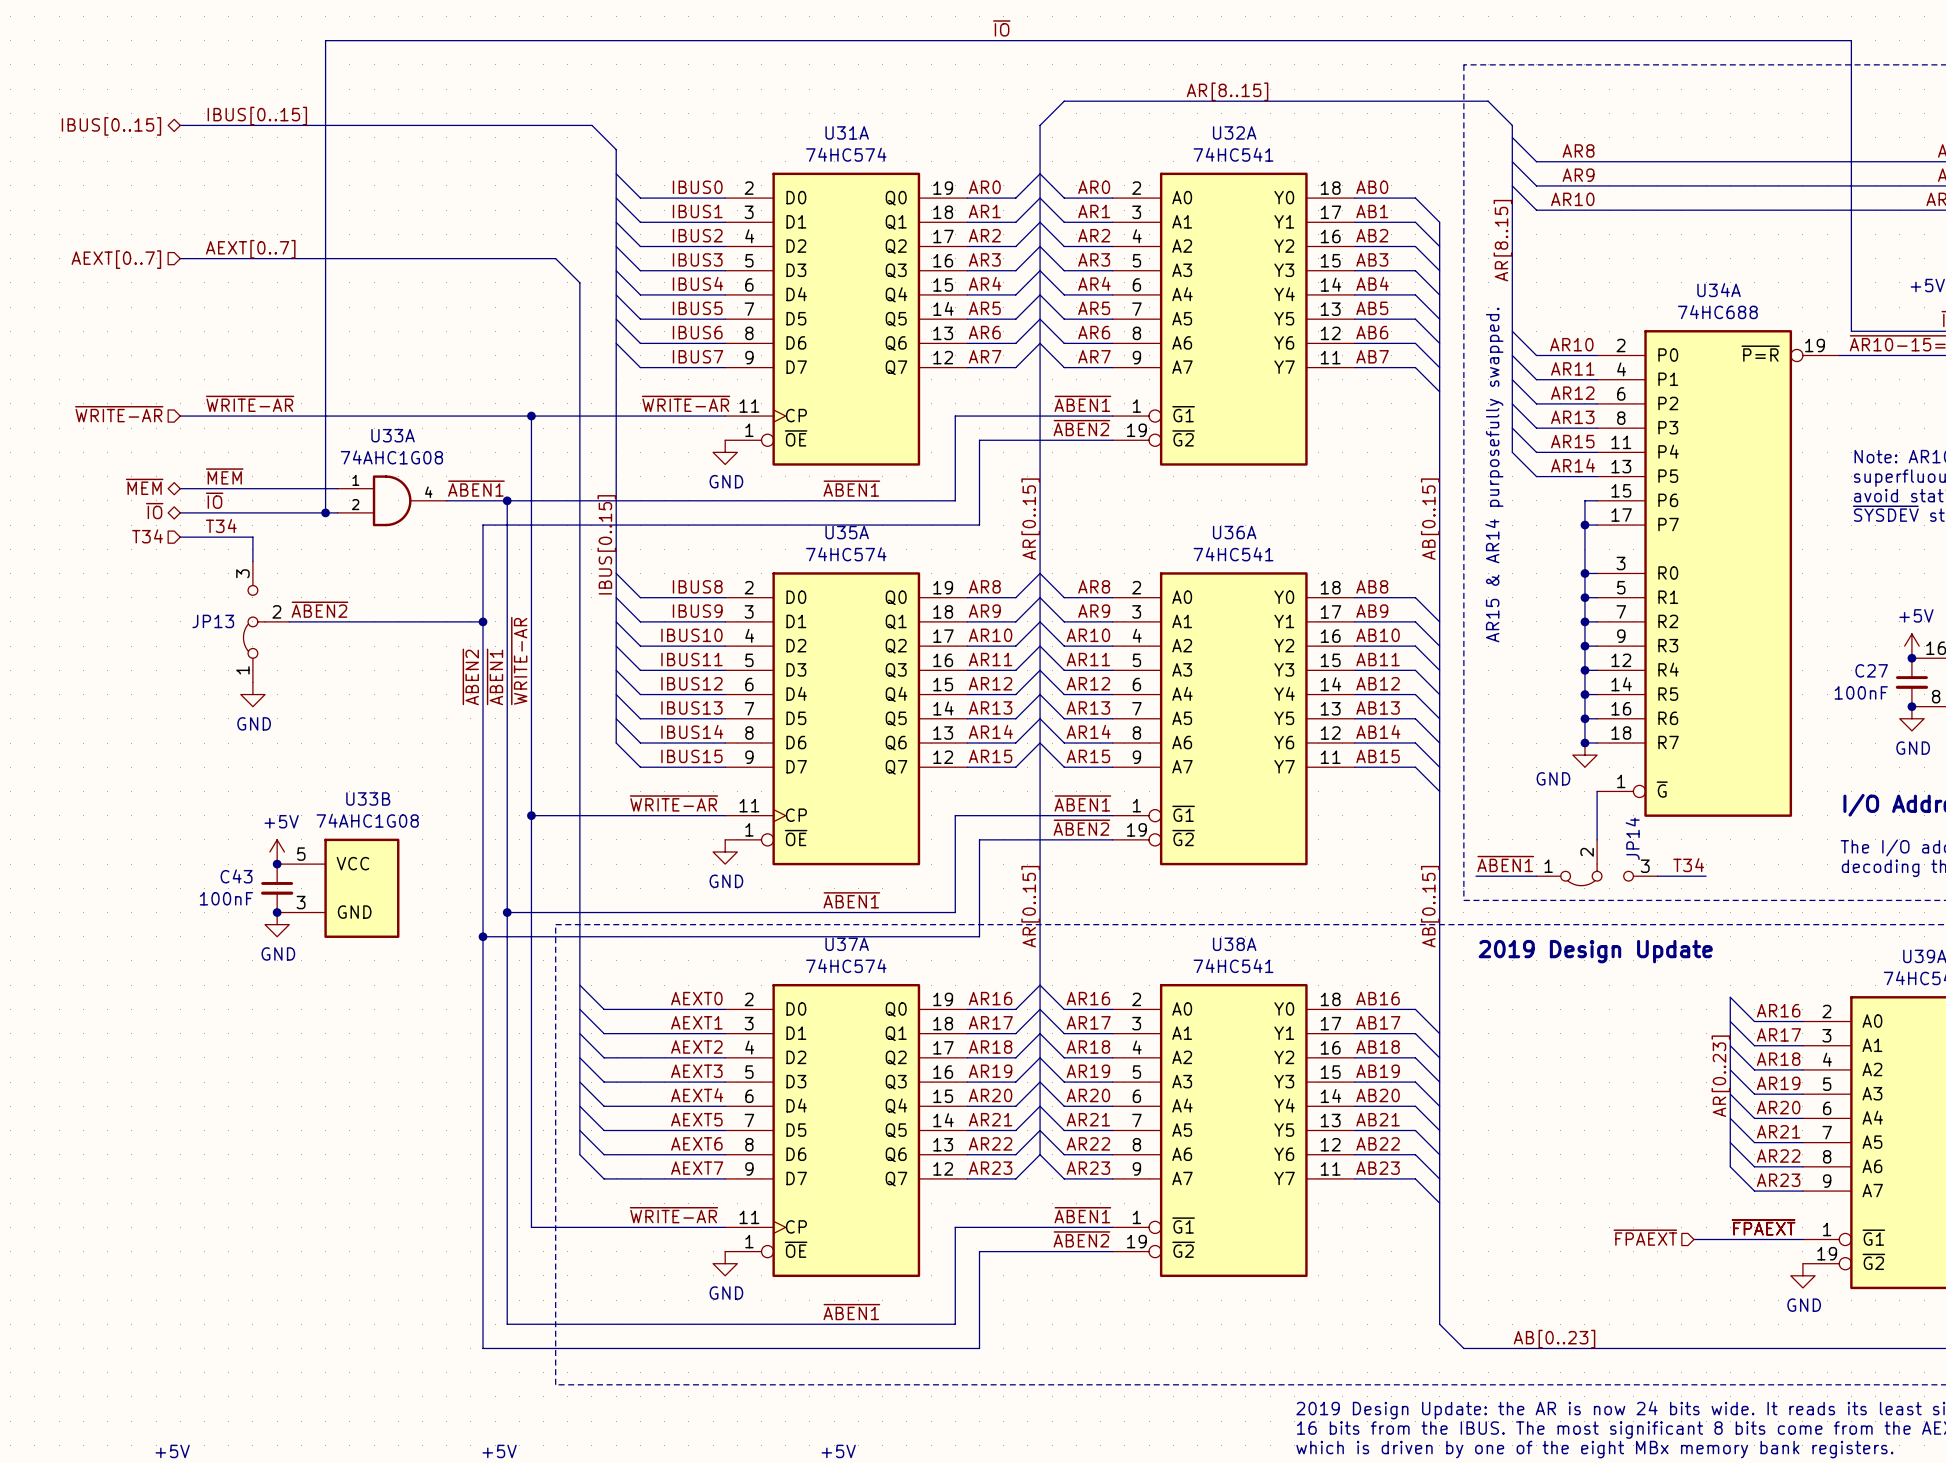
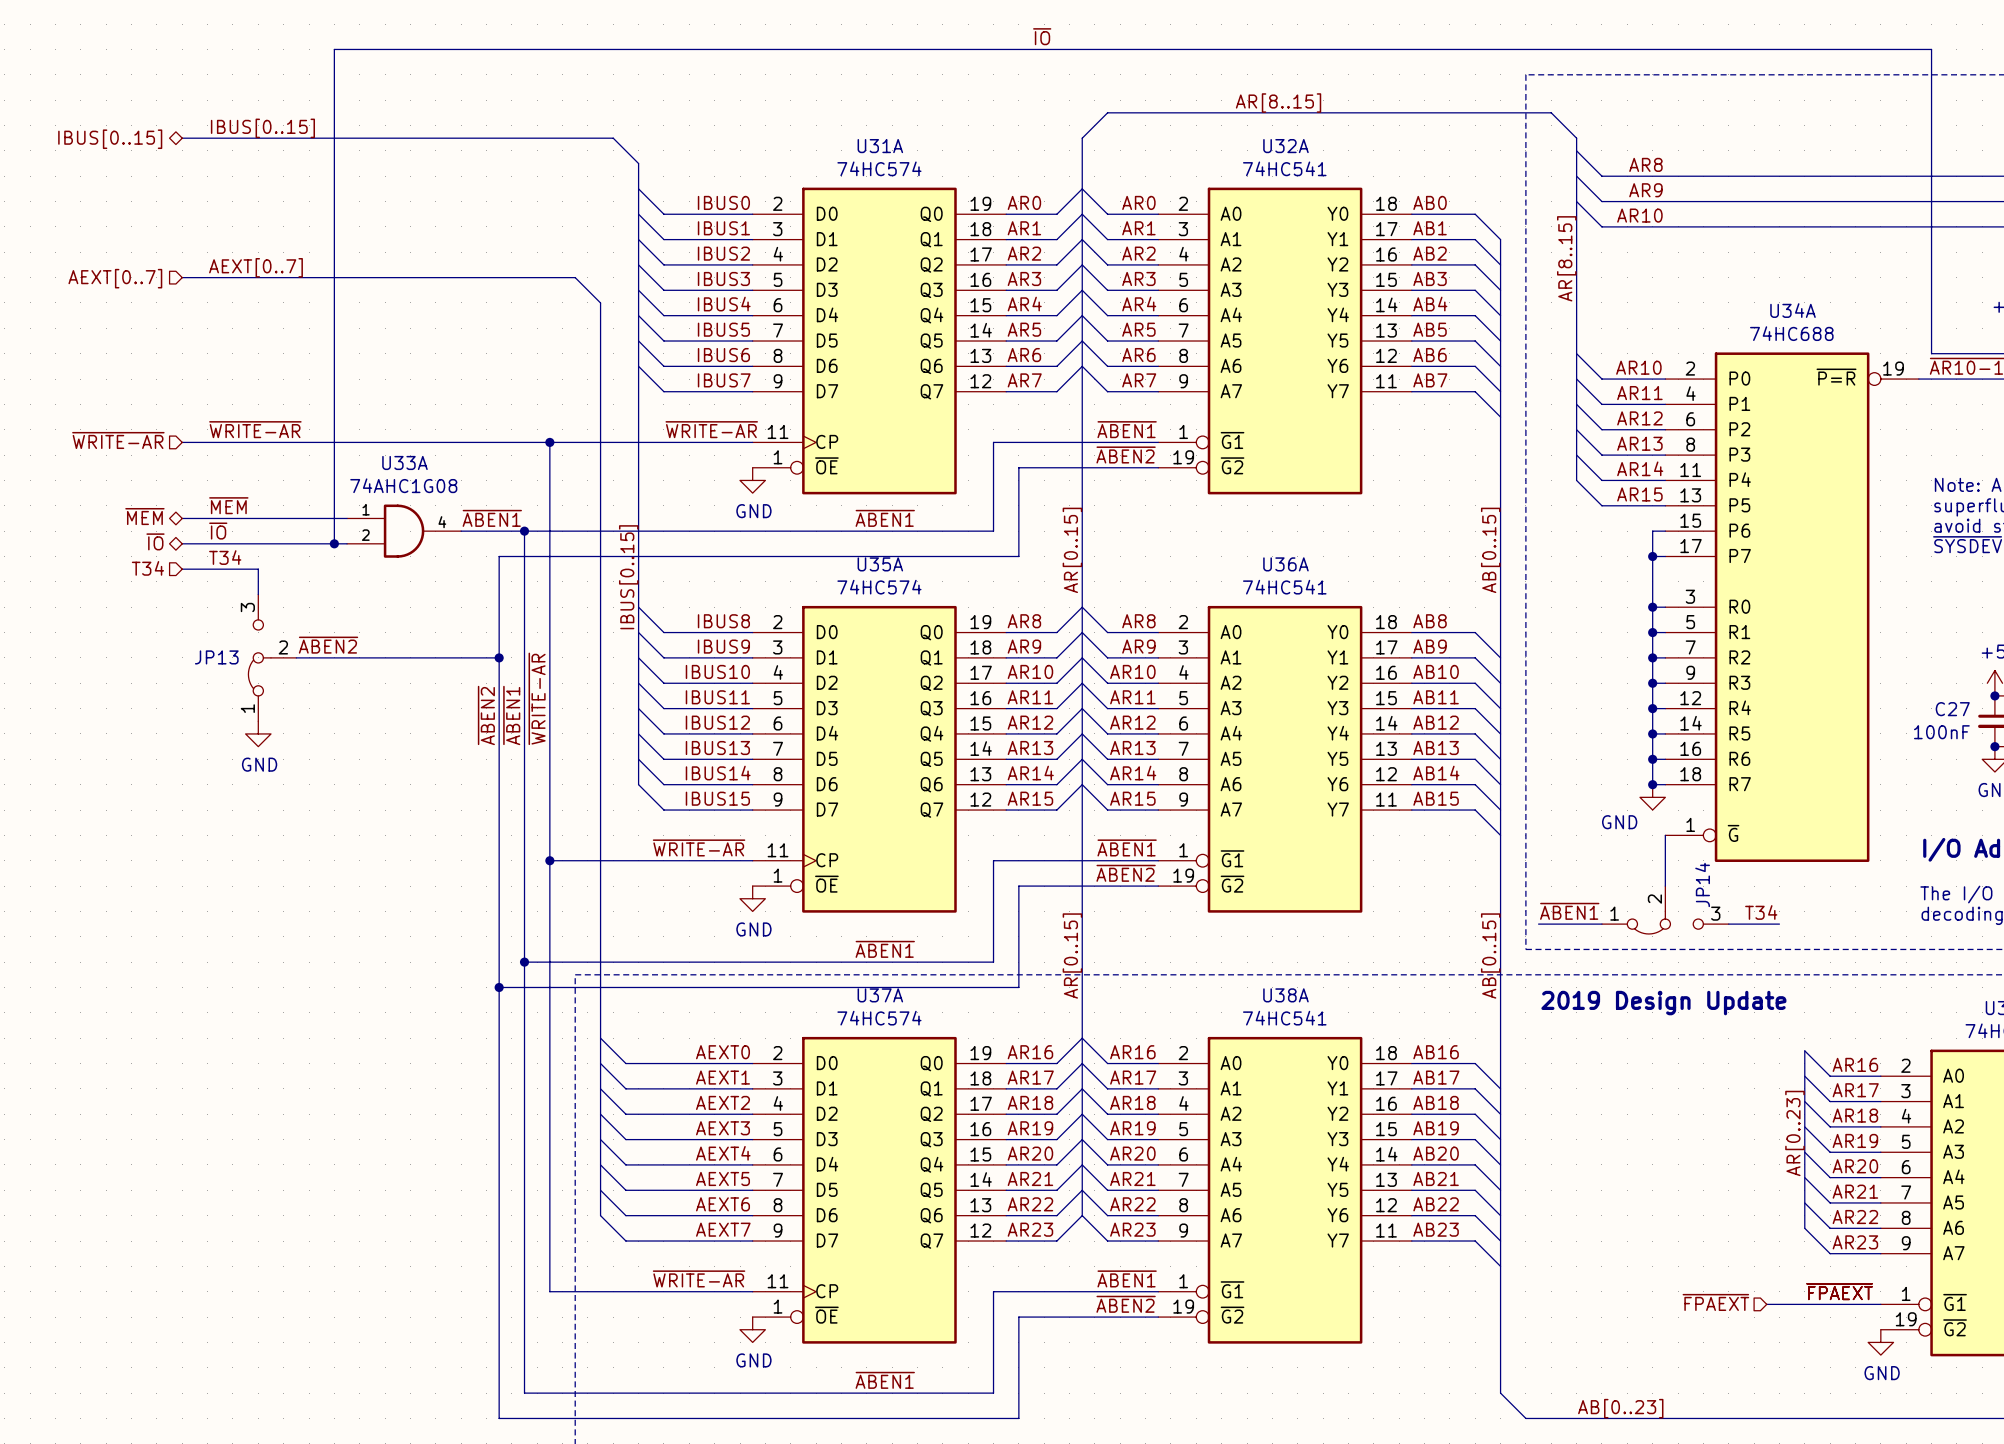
label: AR15 (1572, 441) -> AR14 (1640, 468)
label: AR14 (1573, 465) -> AR15 (1639, 494)
text: AR15 & AR14 purposefully swapped. (1494, 474) -> none
power symbol: +5V (277, 851) -> none
junction: (277, 864) -> none
C43: 100nF (277, 888) -> none
U33B: 74AHC1G08 (338, 888) -> none
junction: (277, 912) -> none
power symbol: GND (277, 924) -> none

